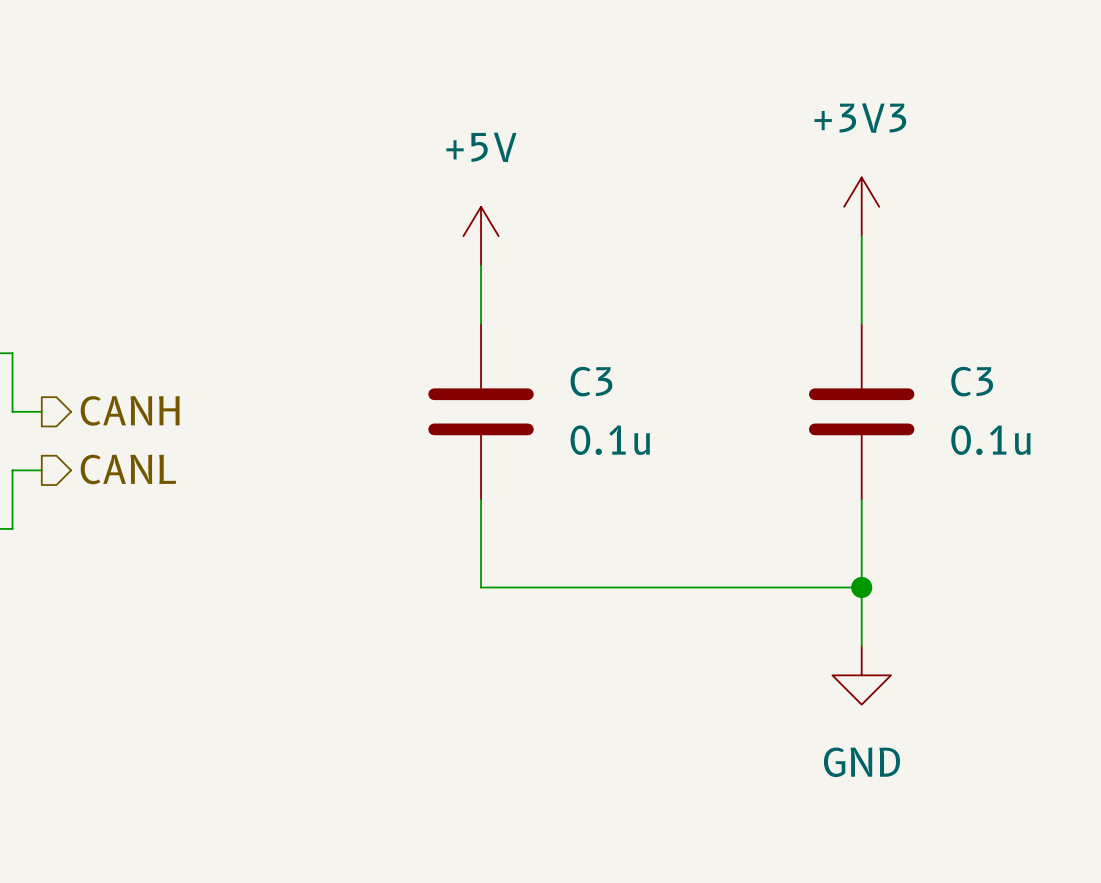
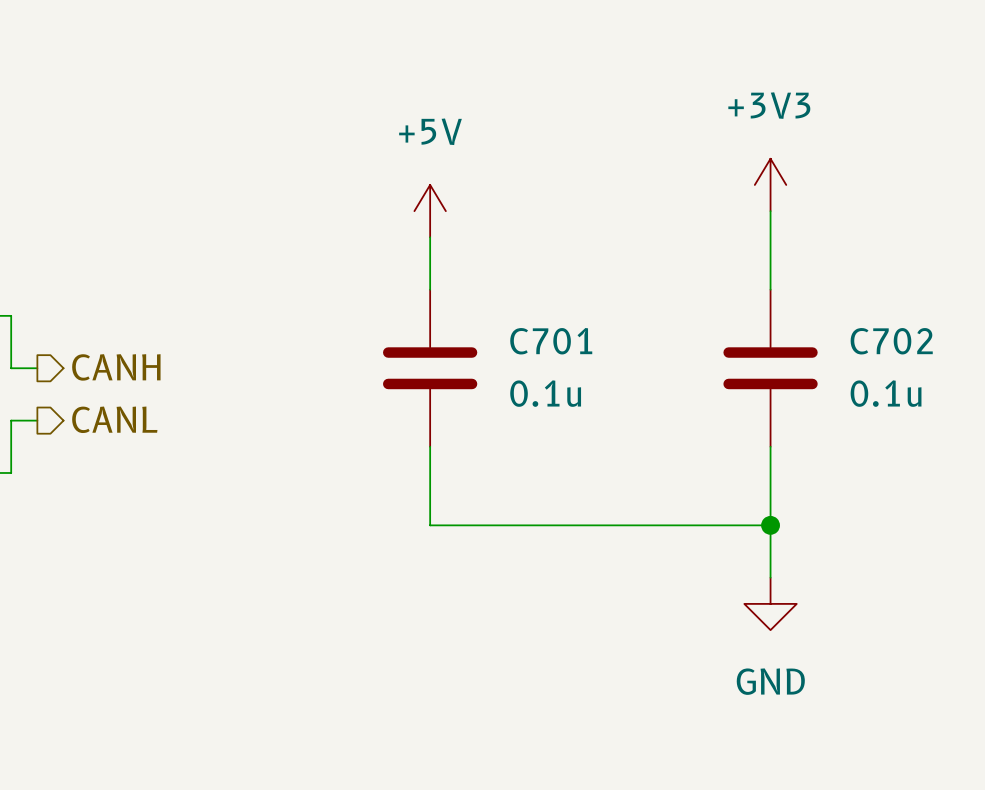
C3 name: C3 (591, 381) -> C701 (551, 341)
C3 name: C3 (972, 381) -> C702 (891, 341)

